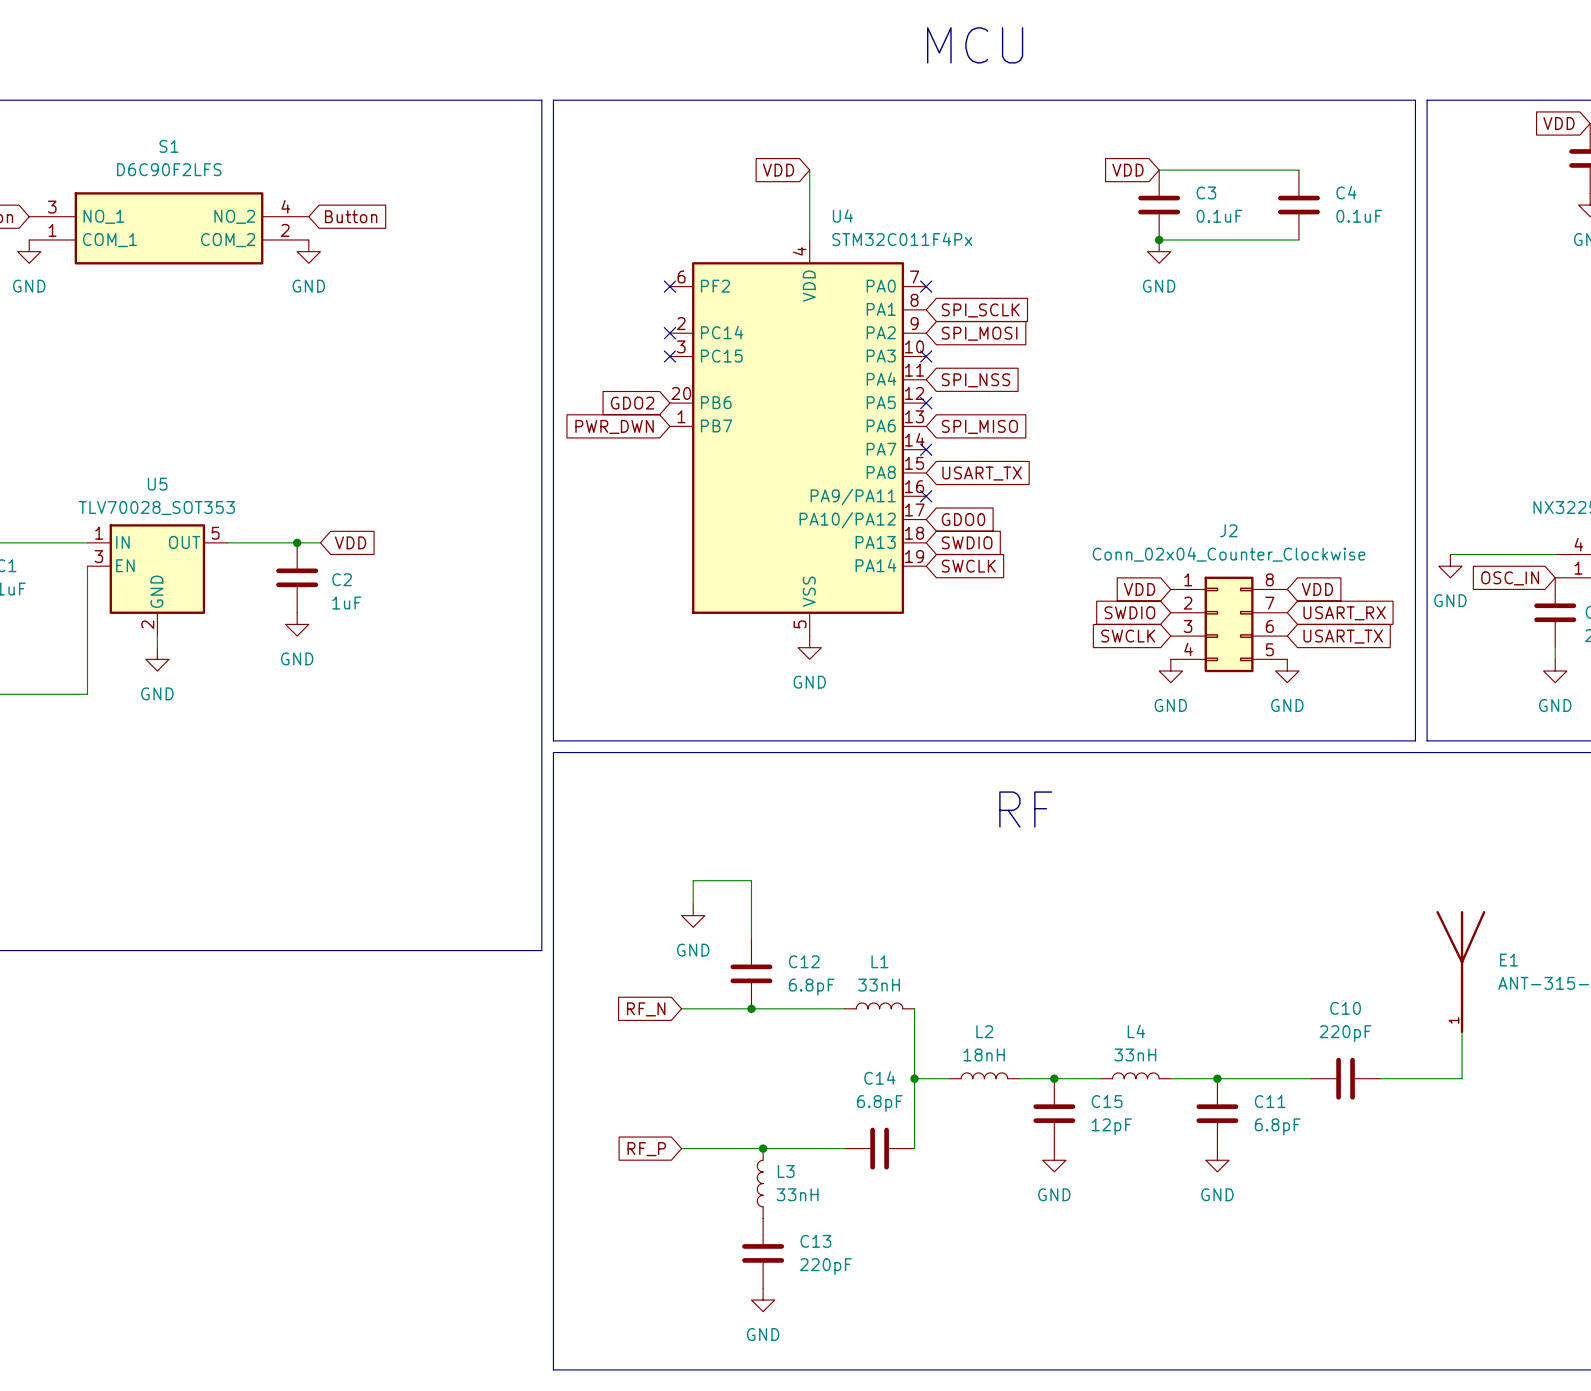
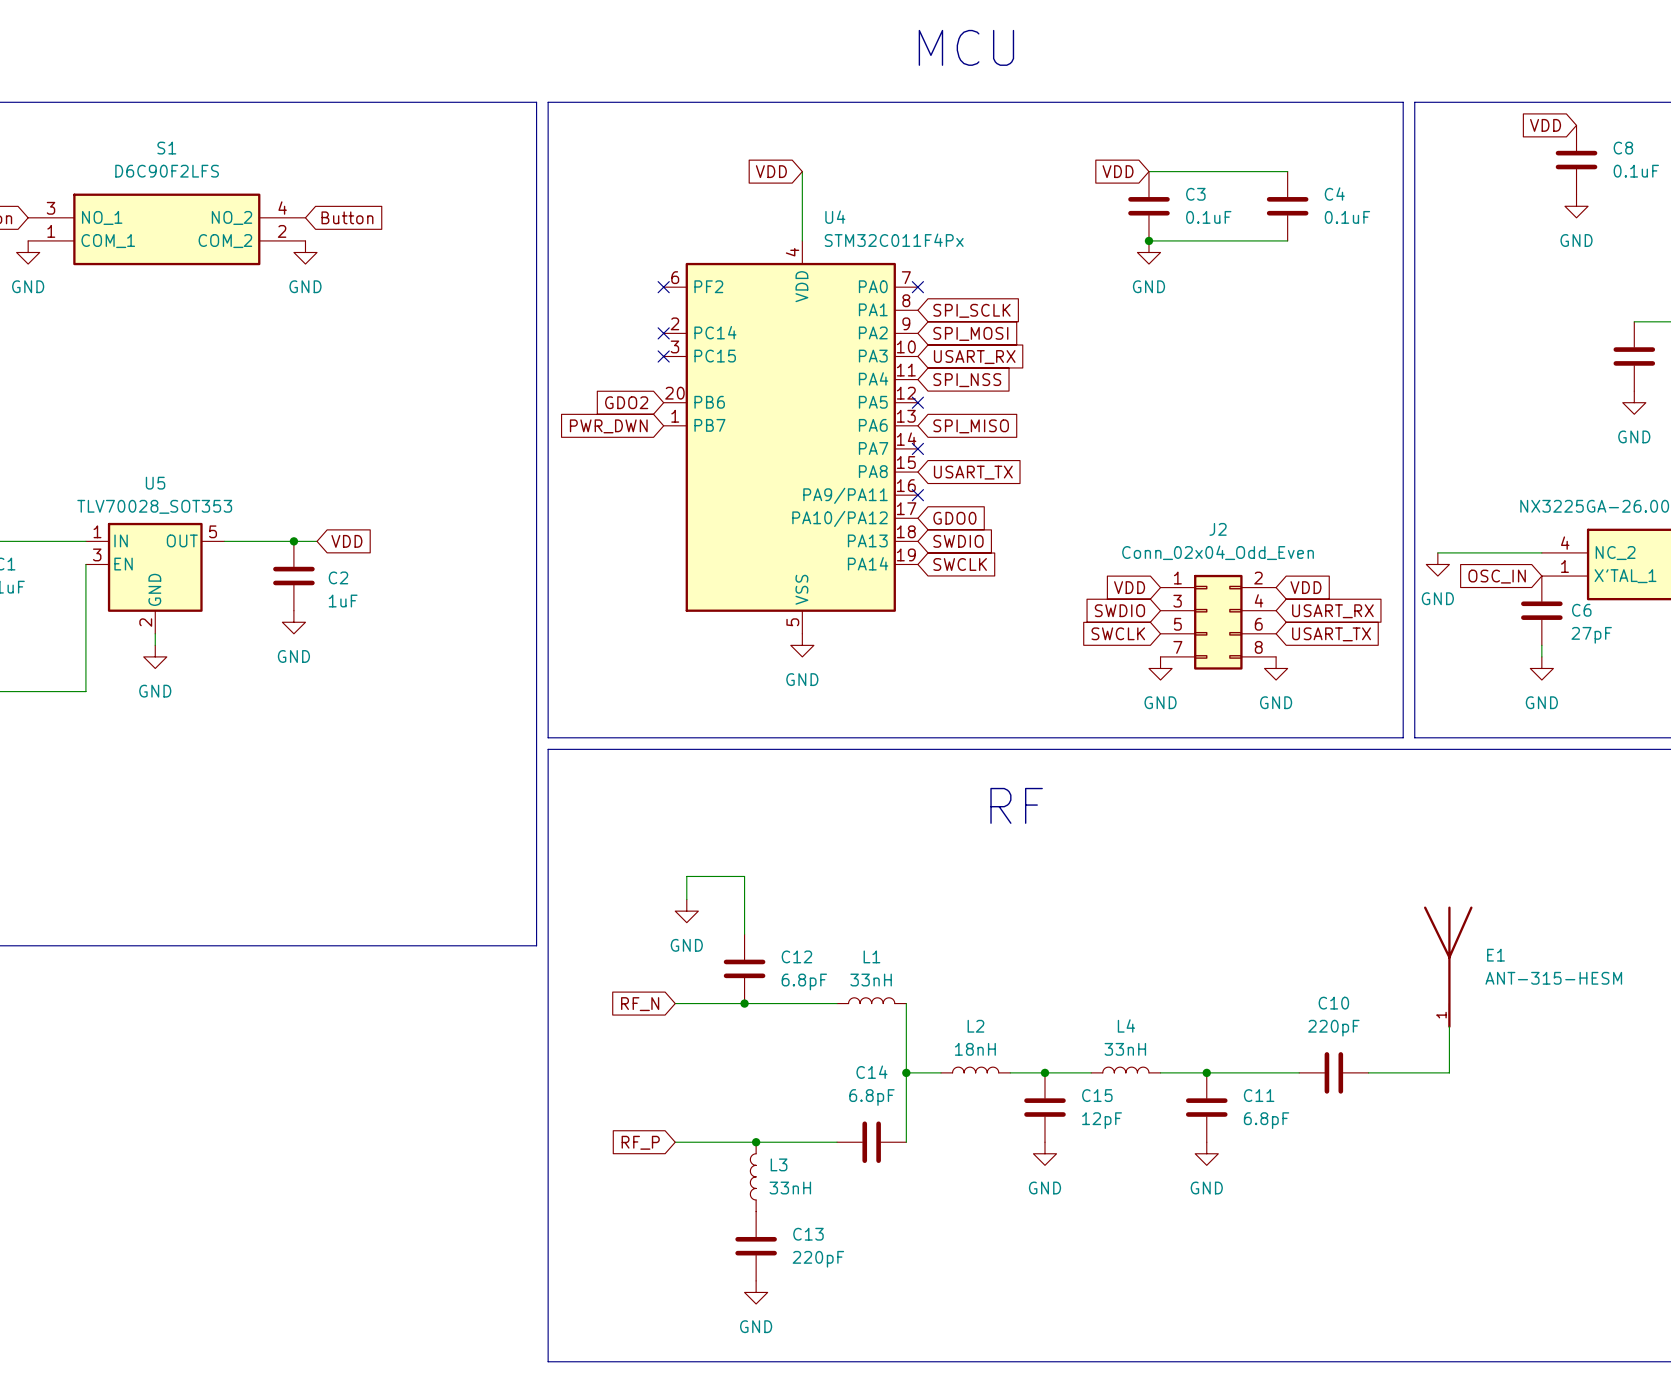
no-connect mark: (926, 356) -> none
global label: none -> USART_RX (974, 357)
J2 value: Conn_02x04_Counter_Clockwise (1229, 554) -> Conn_02x04_Odd_Even (1218, 552)
J2 pin number: 8 (1269, 579) -> 2 (1258, 578)
J2 pin number: 2 (1188, 603) -> 3 (1177, 601)
J2 pin number: 7 (1269, 603) -> 4 (1259, 600)
J2 pin number: 3 (1188, 626) -> 5 (1177, 624)
J2 pin number: 4 (1188, 649) -> 7 (1177, 647)
J2 pin number: 5 (1269, 649) -> 8 (1258, 647)

